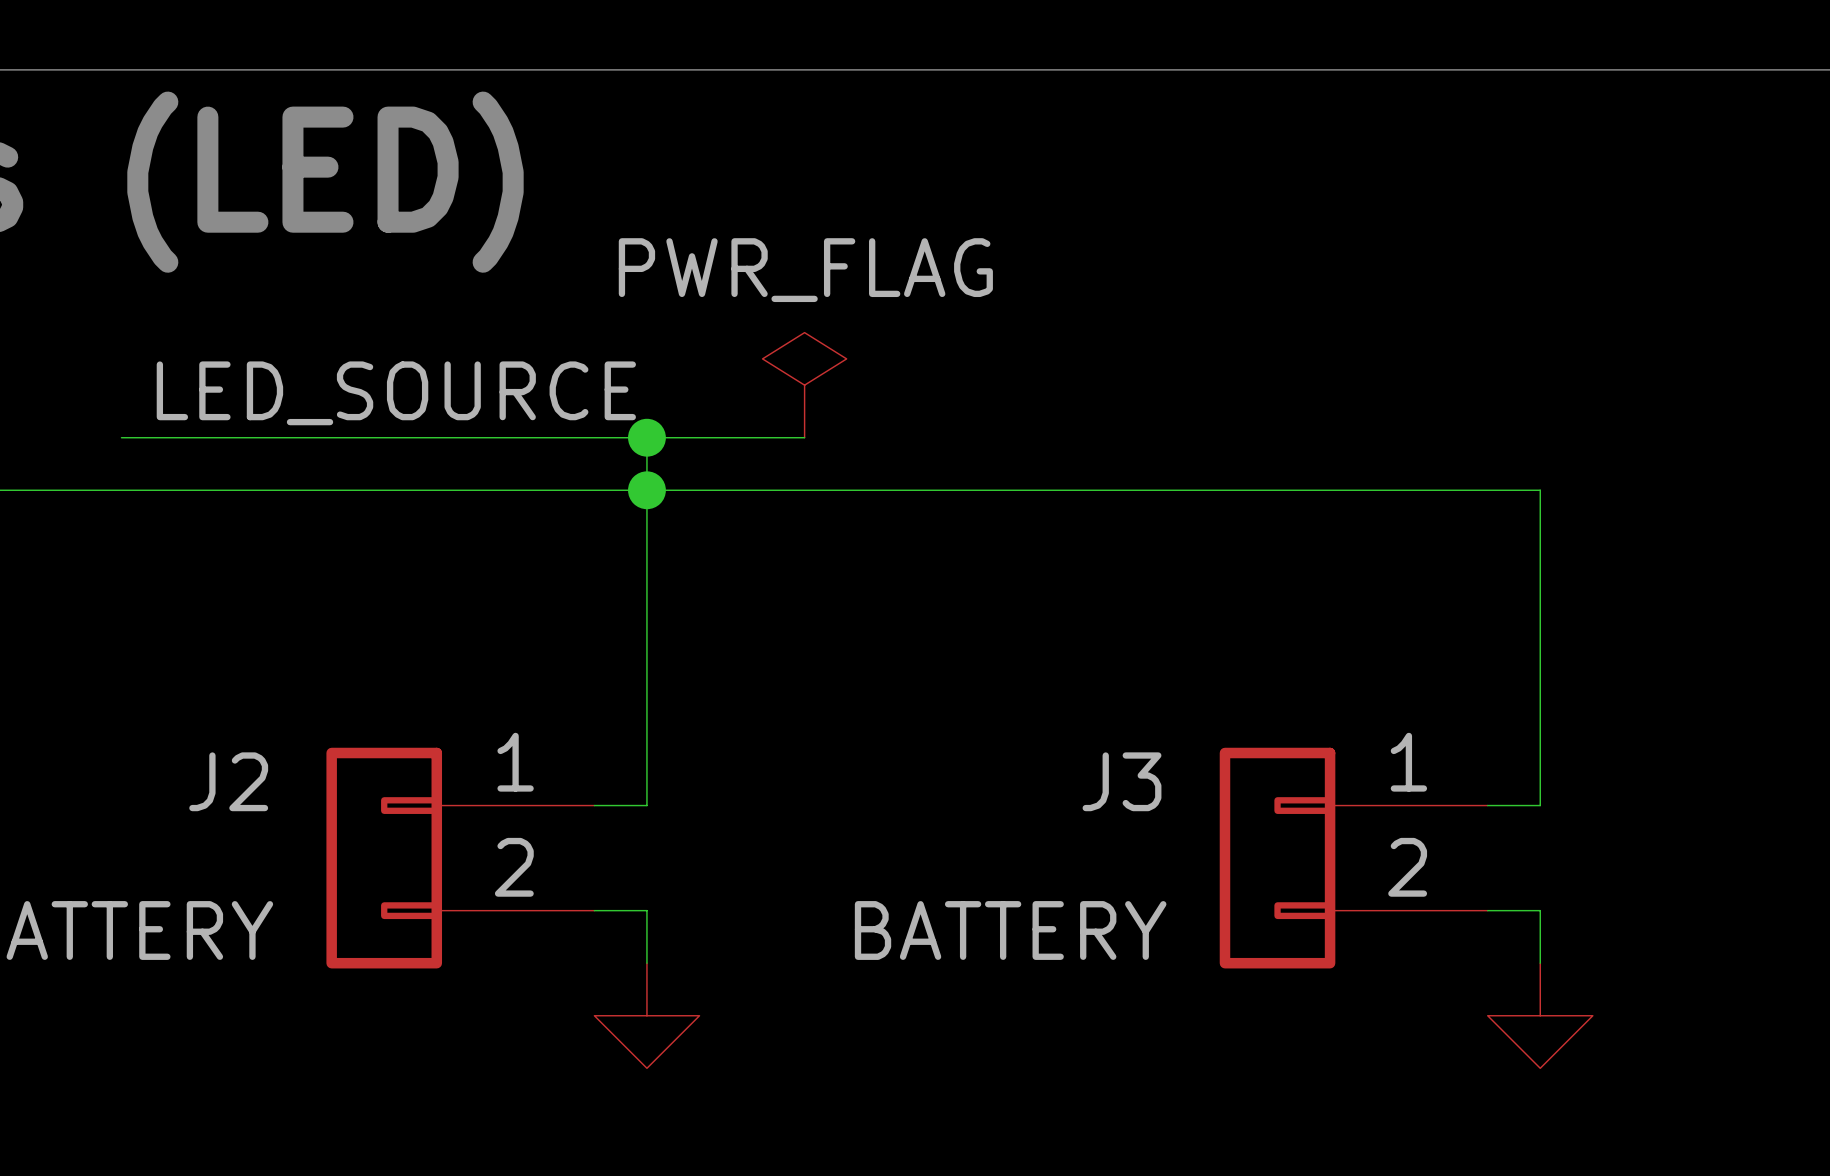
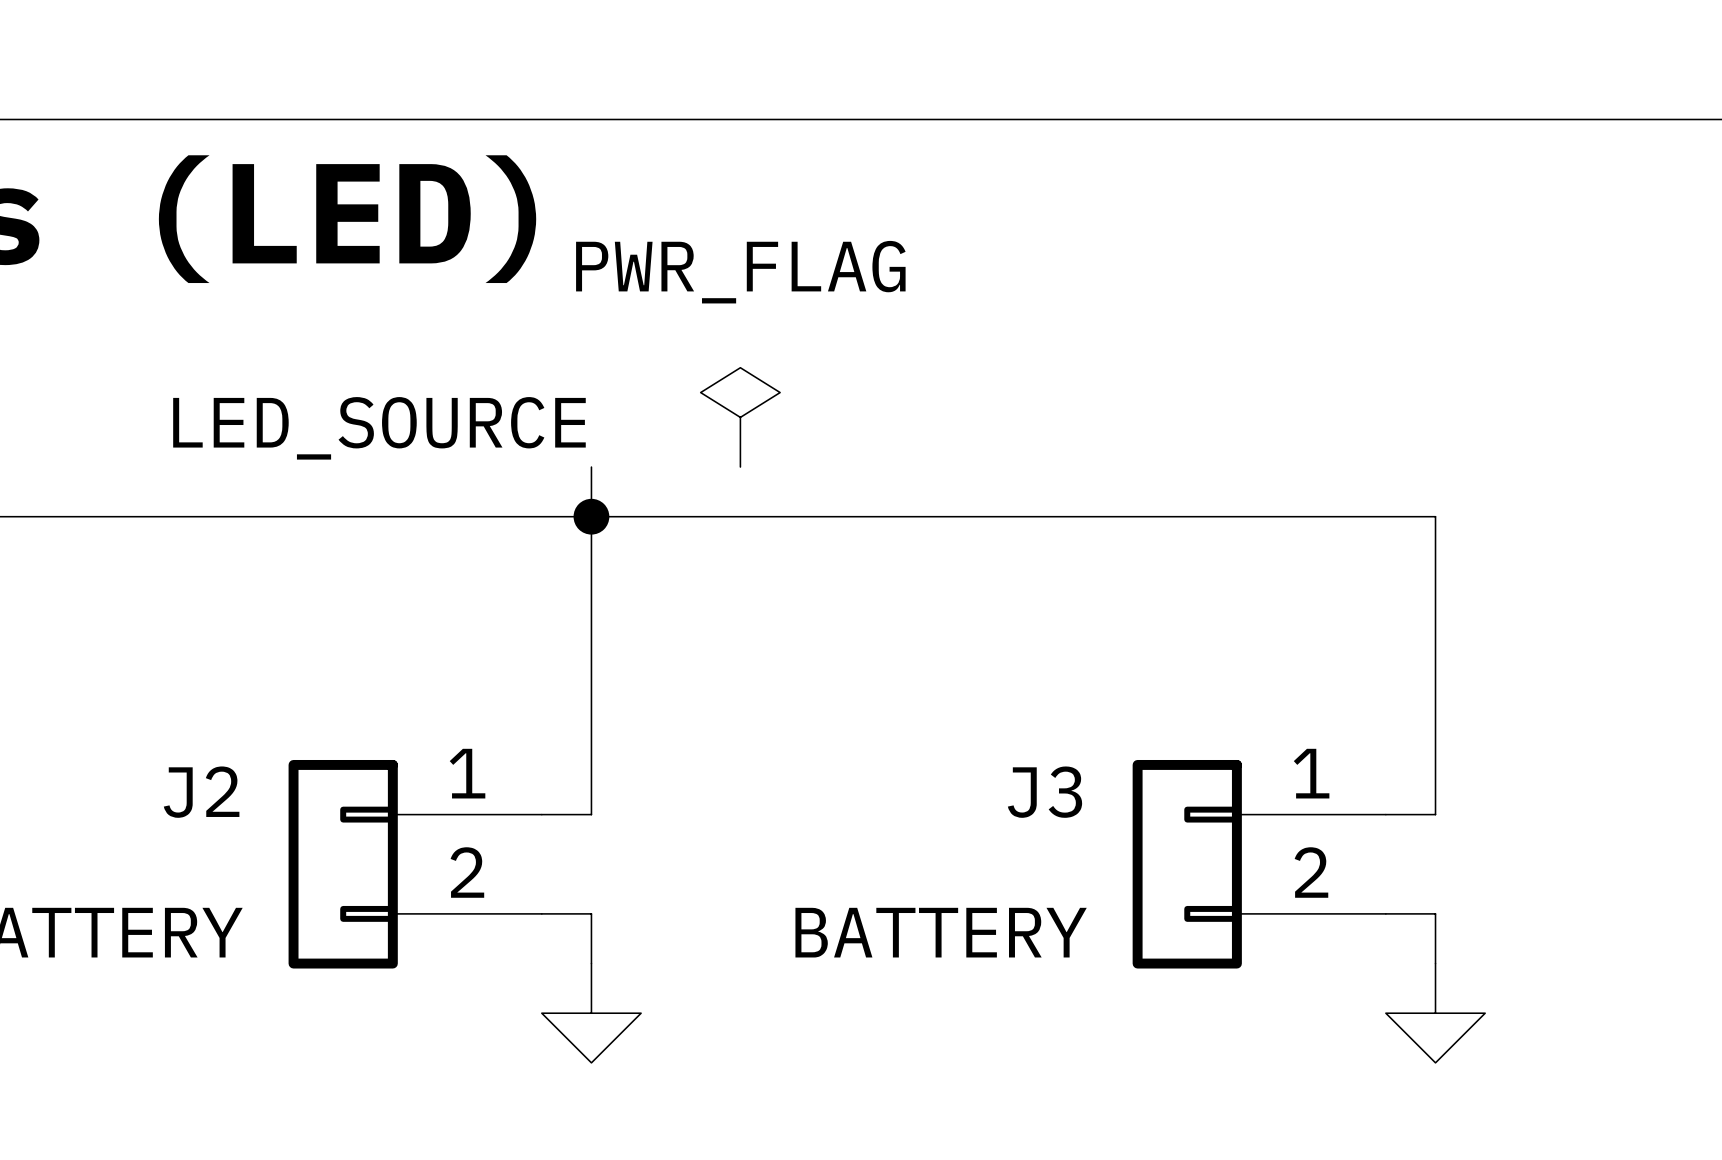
power symbol text position: PWR_FLAG (805, 270) -> PWR_FLAG (740, 272)
wire: (121, 437) (804, 437) -> none
junction: (646, 437) -> none

